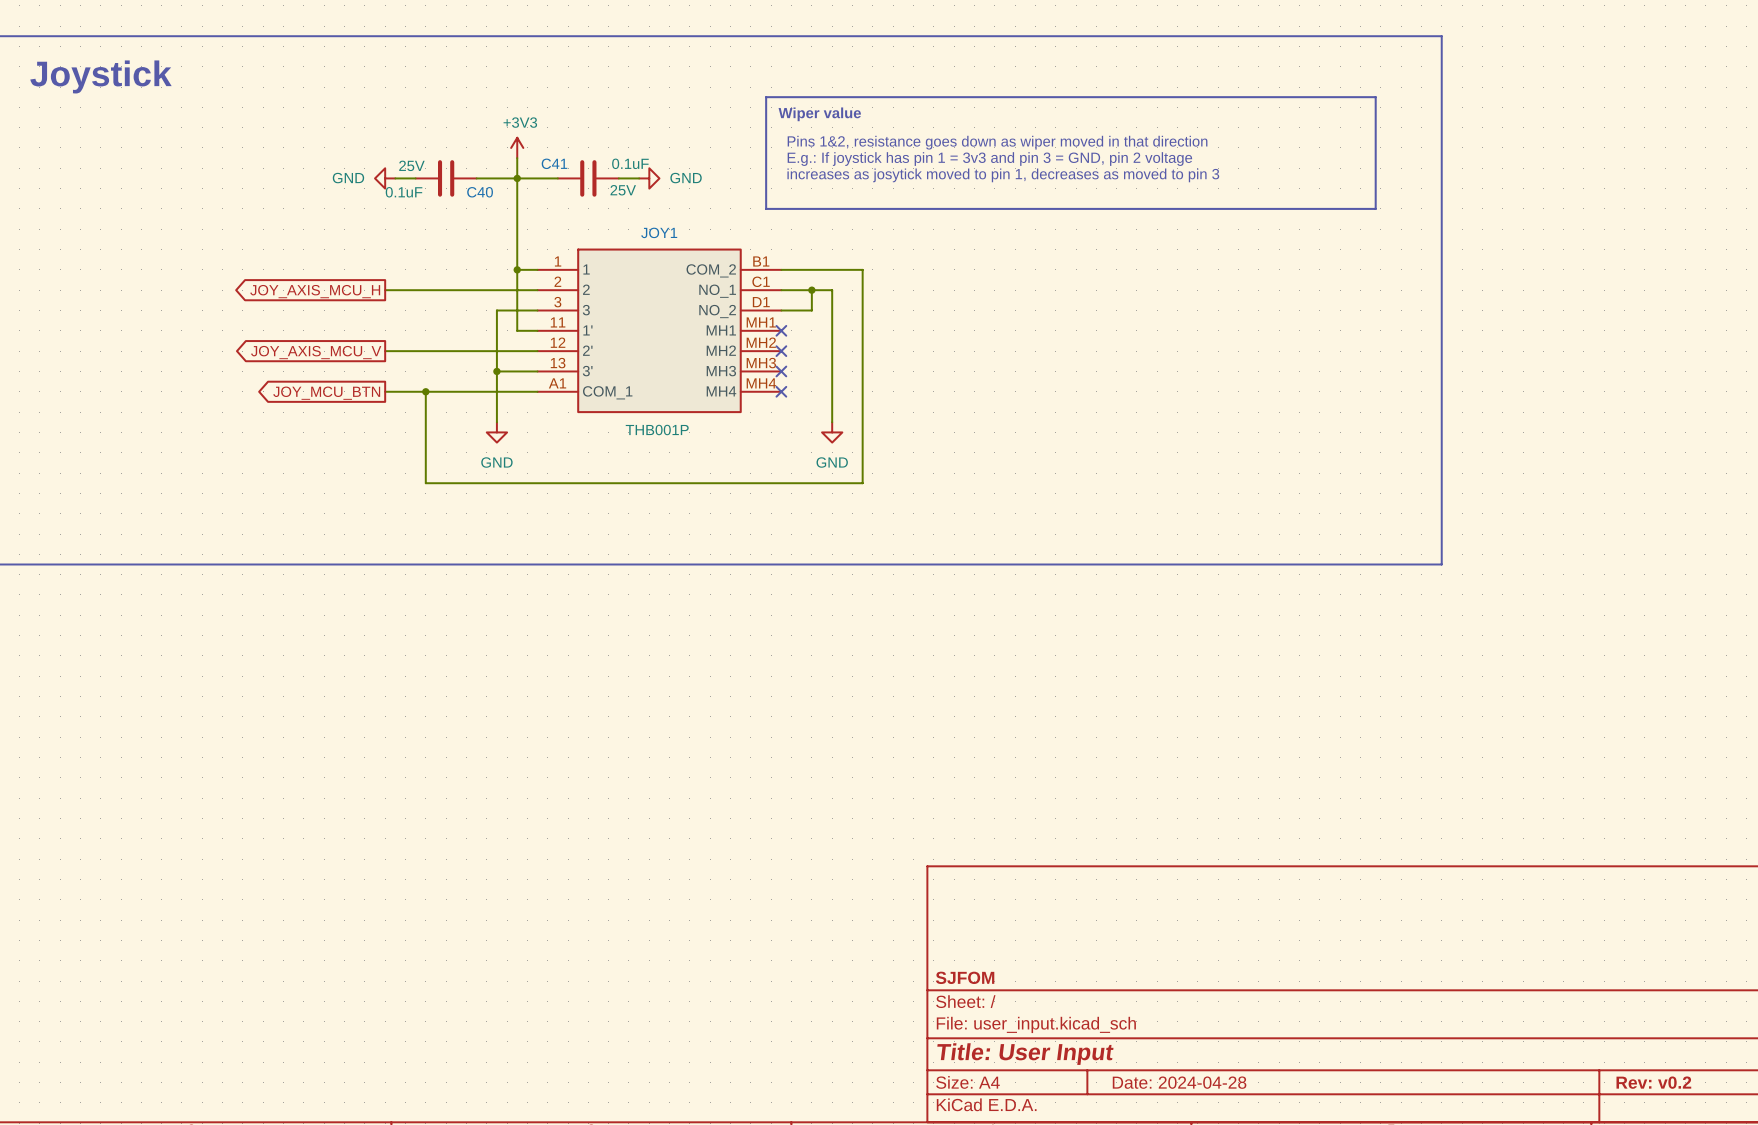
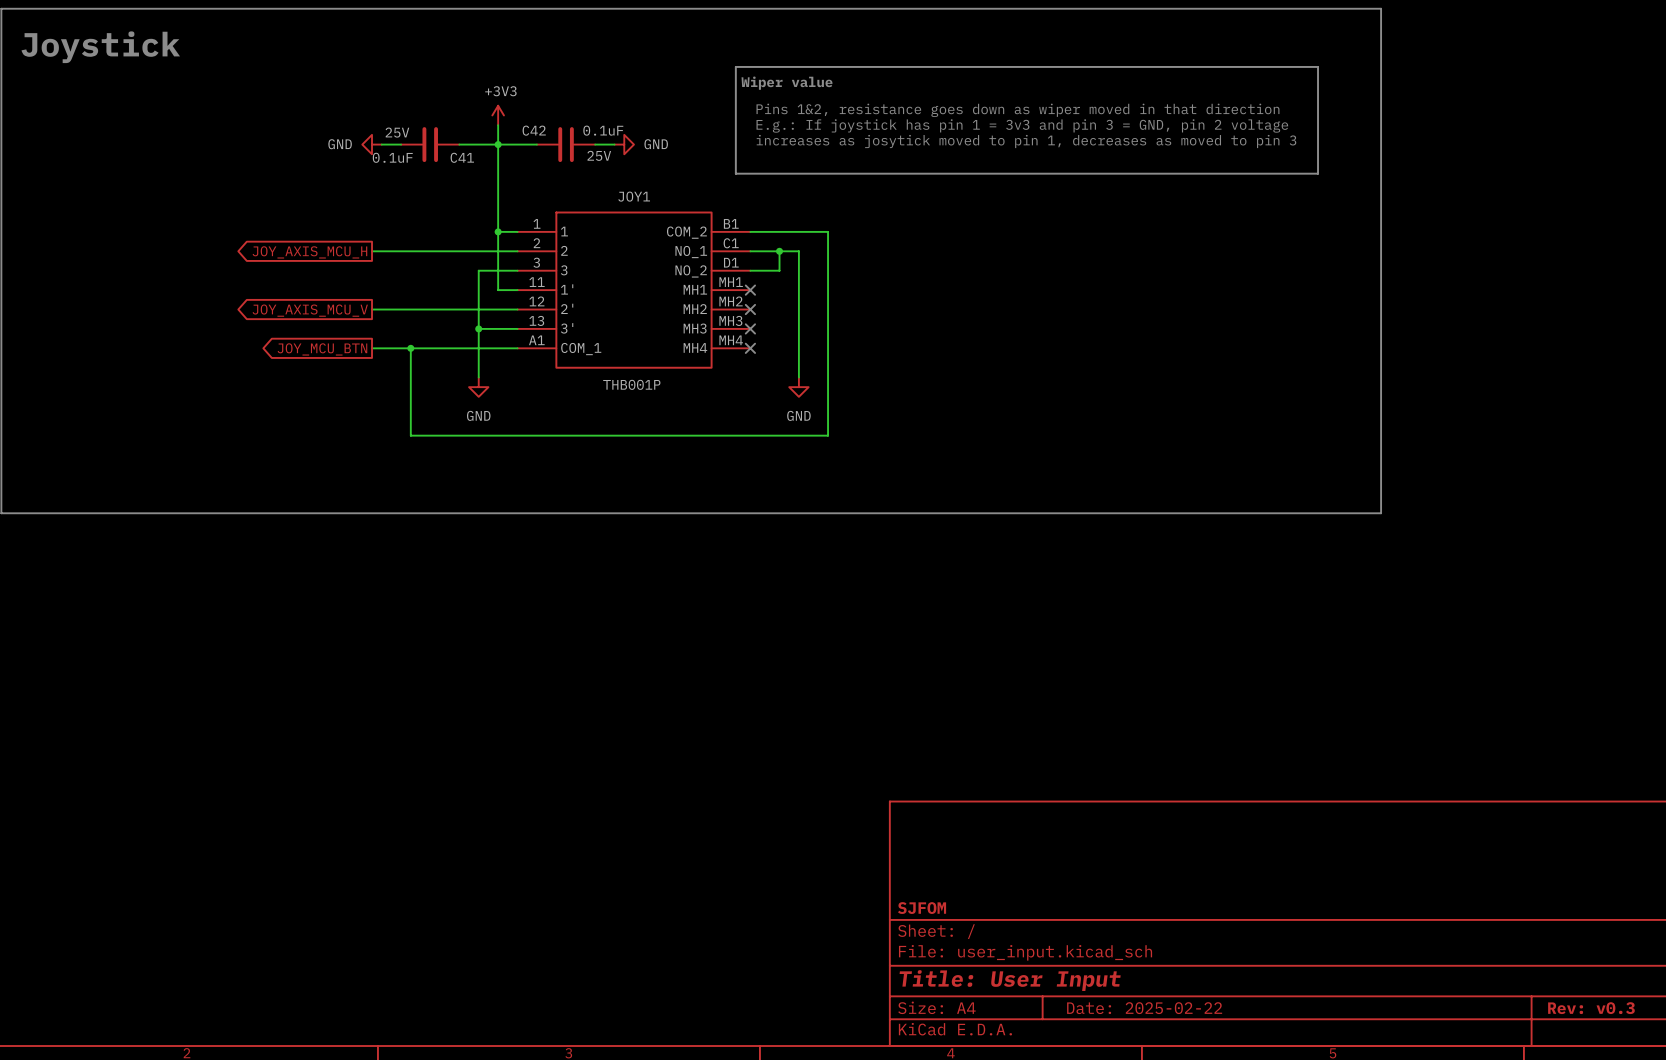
C41 name: C41 (554, 163) -> C42 (534, 130)
C40 name: C40 (480, 192) -> C41 (462, 157)
title block: Date: 2024-04-28 (1179, 1082) -> Date: 2025-02-22 (1144, 1008)
title block: Rev: v0.2 (1653, 1082) -> Rev: v0.3 (1591, 1008)

